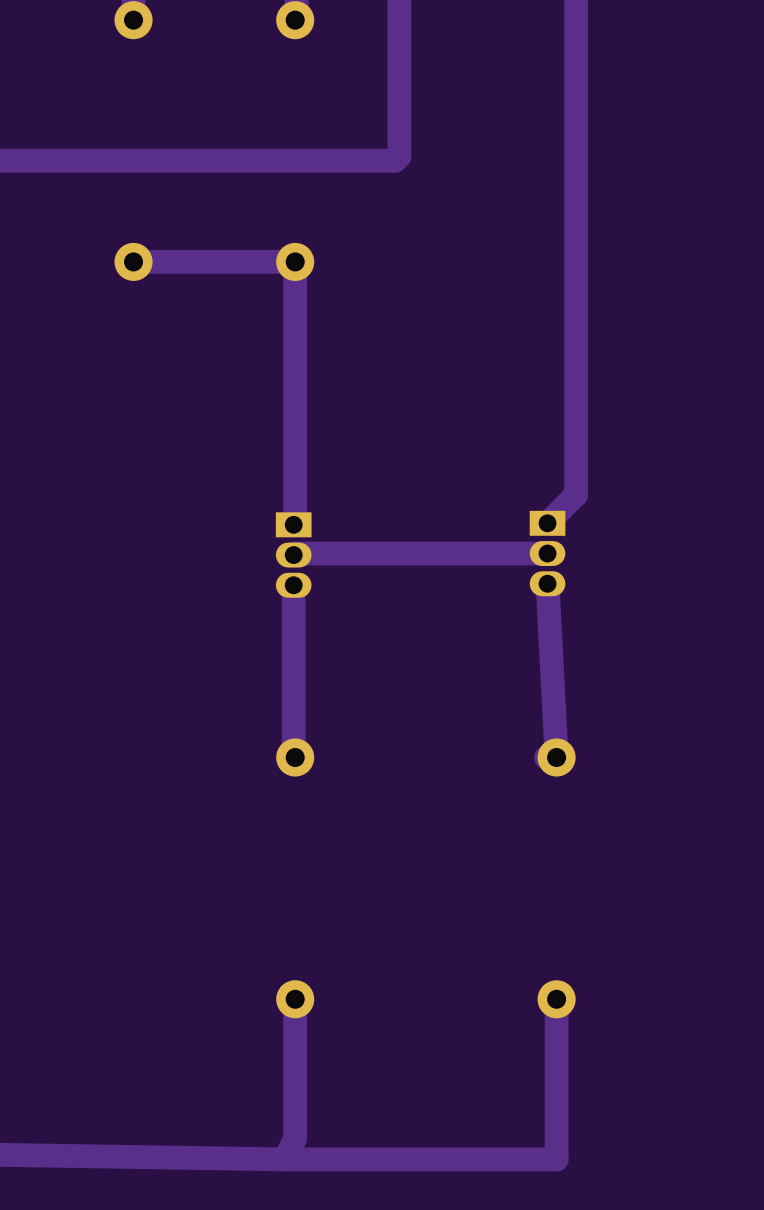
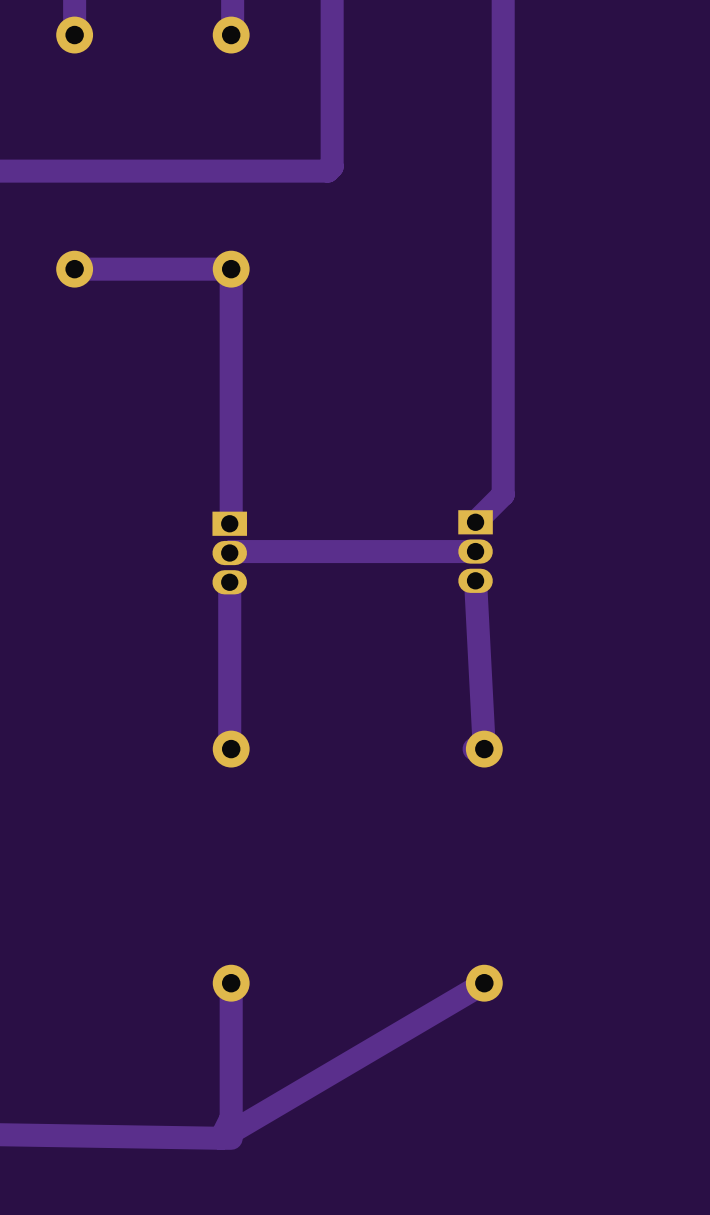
track: (556, 999) (556, 1159) (295, 1159) -> (484, 983) (220, 1138)

